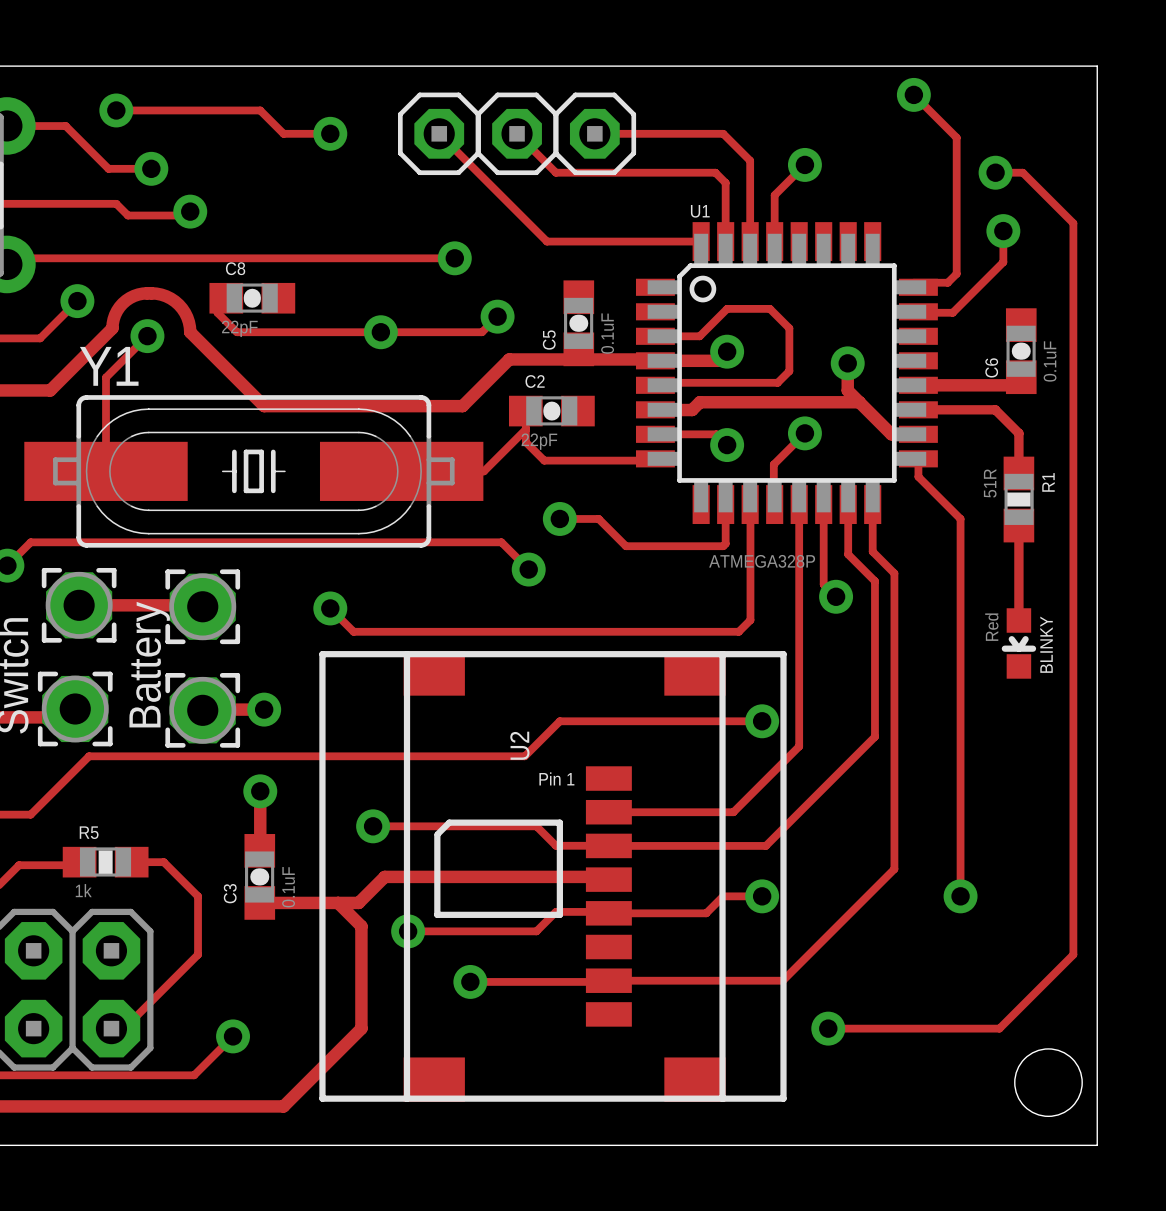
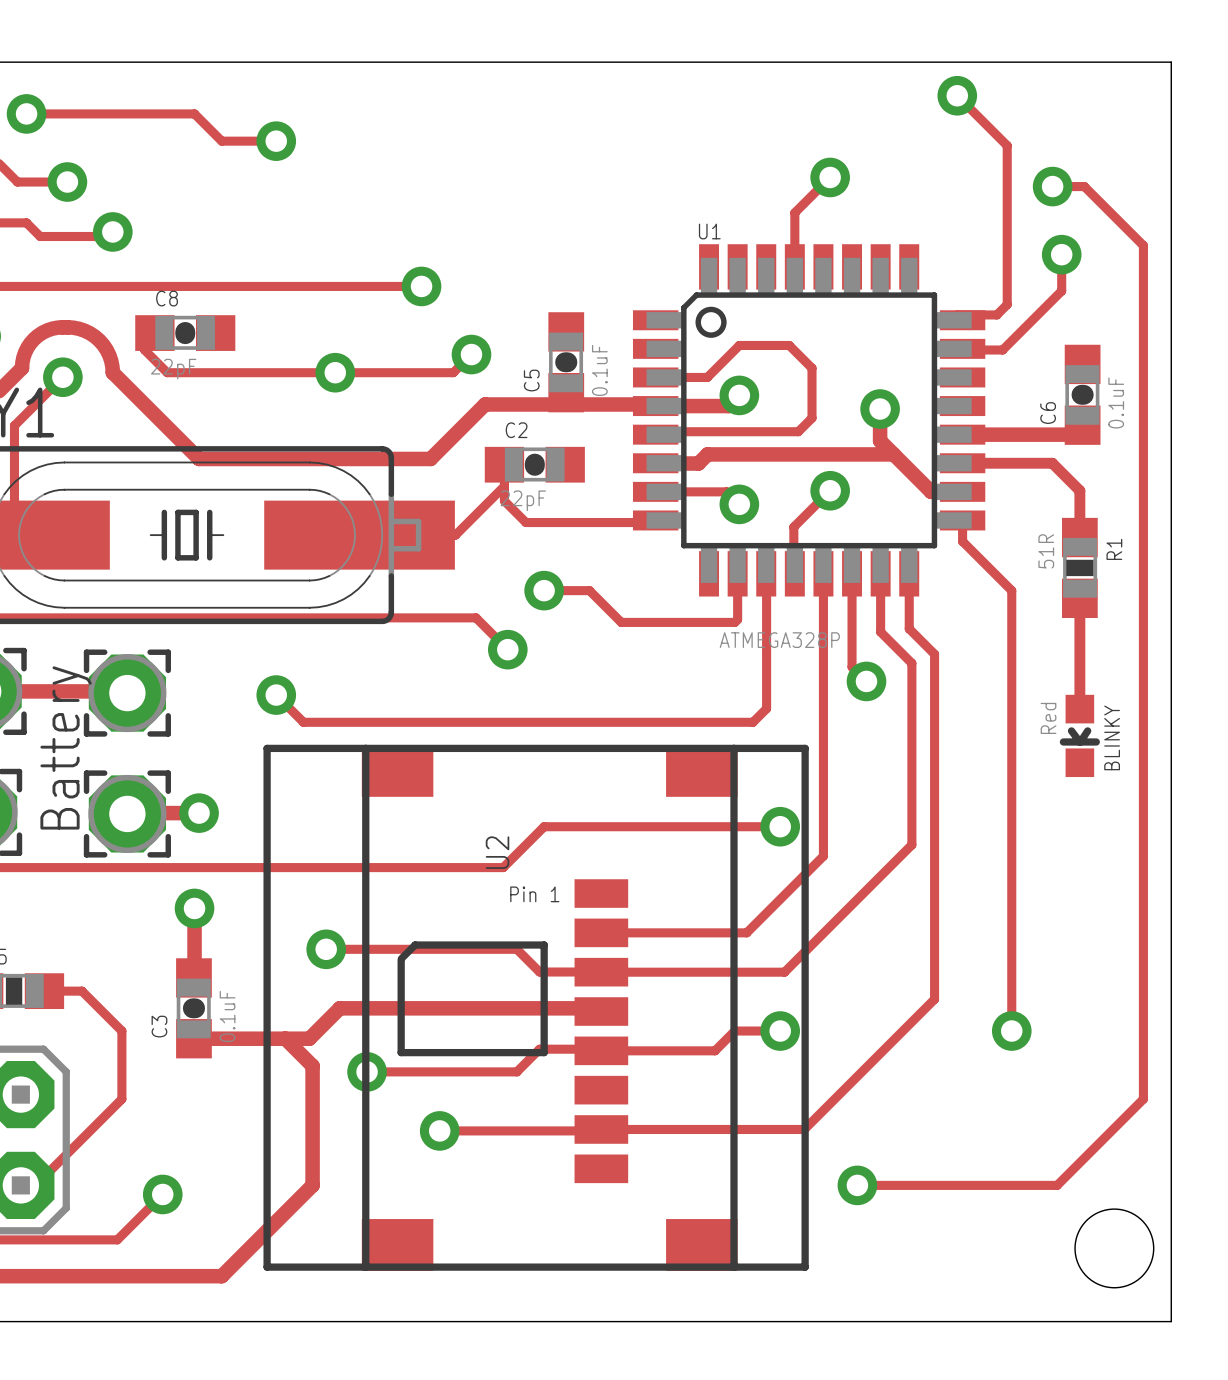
track: (439, 133) (546, 241) (701, 241) -> none
part: (439, 133) -> none
track: (517, 133) (555, 172) (715, 172) (725, 182) (725, 241) -> none
part: (517, 133) -> none
track: (594, 133) (723, 133) (750, 160) (750, 241) -> none
part: (594, 133) -> none

